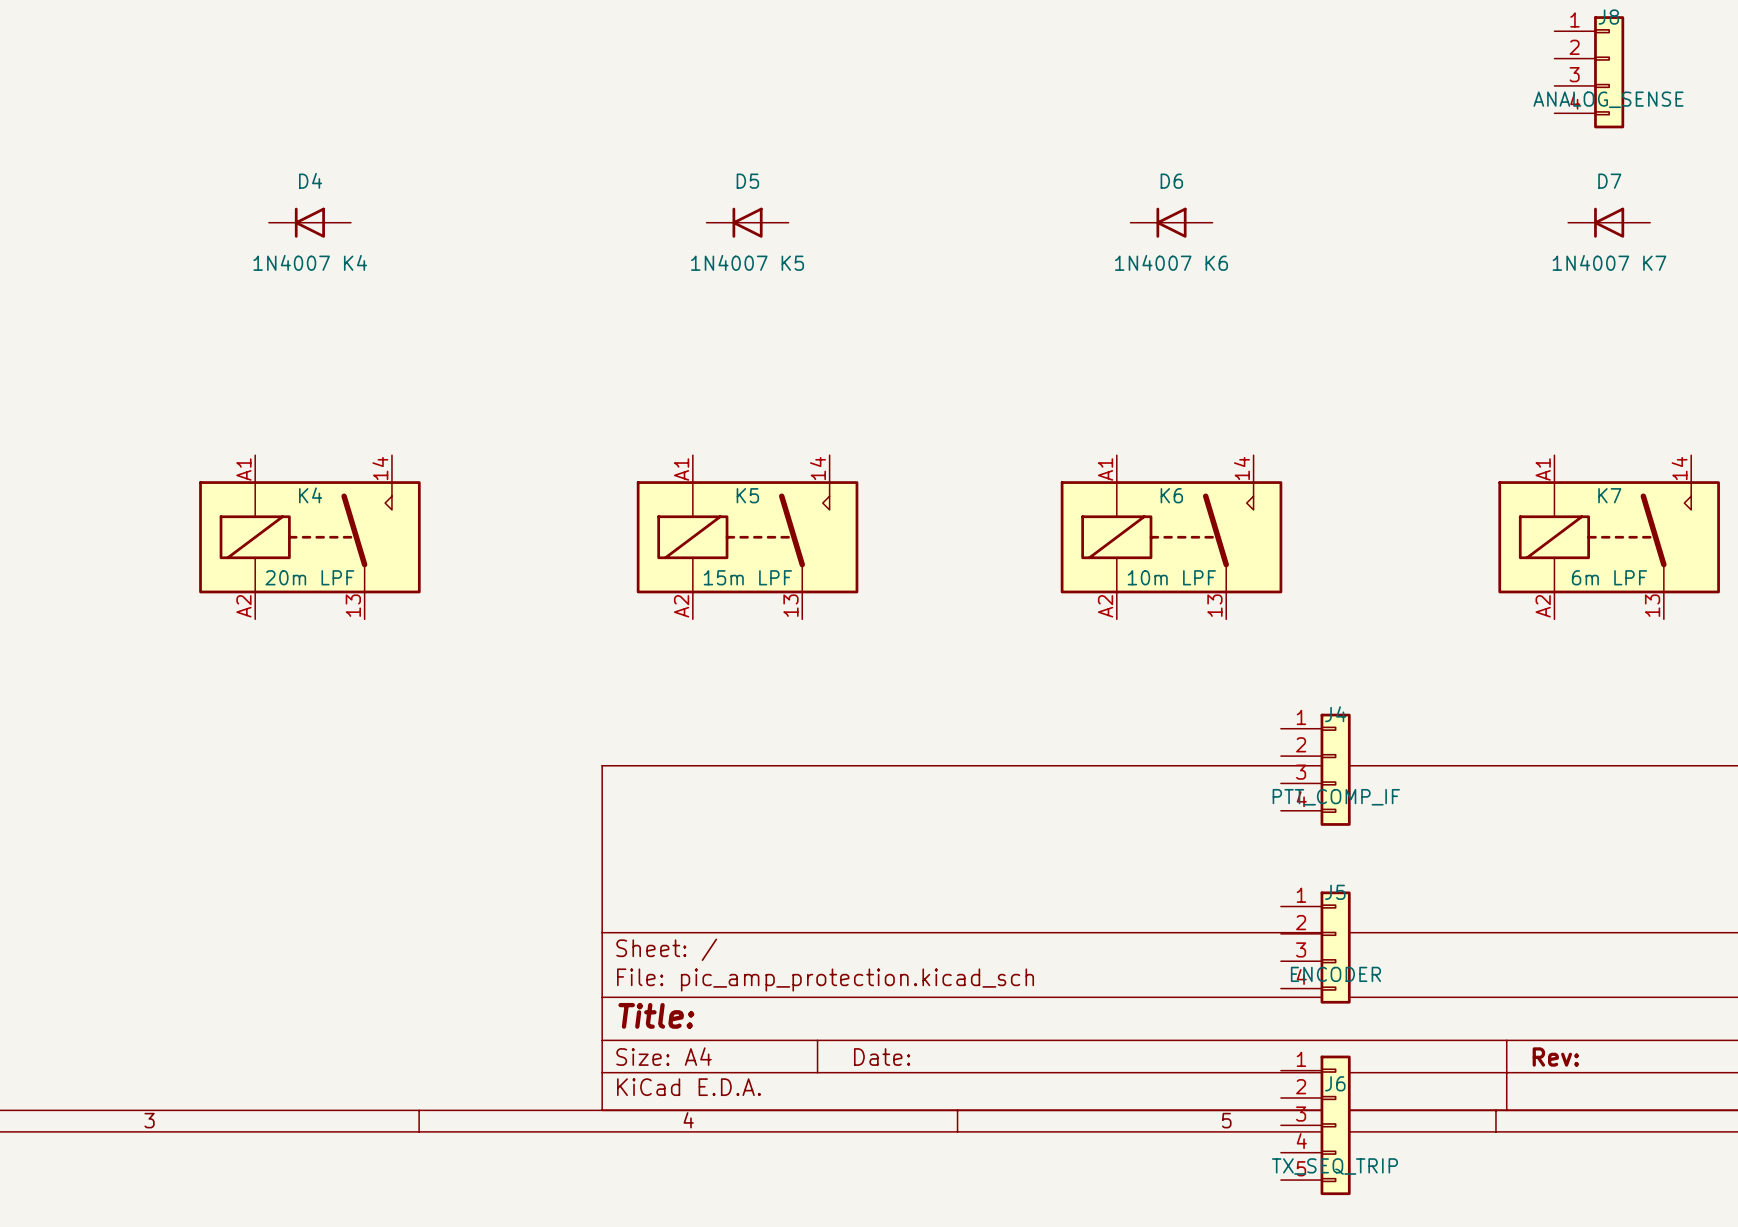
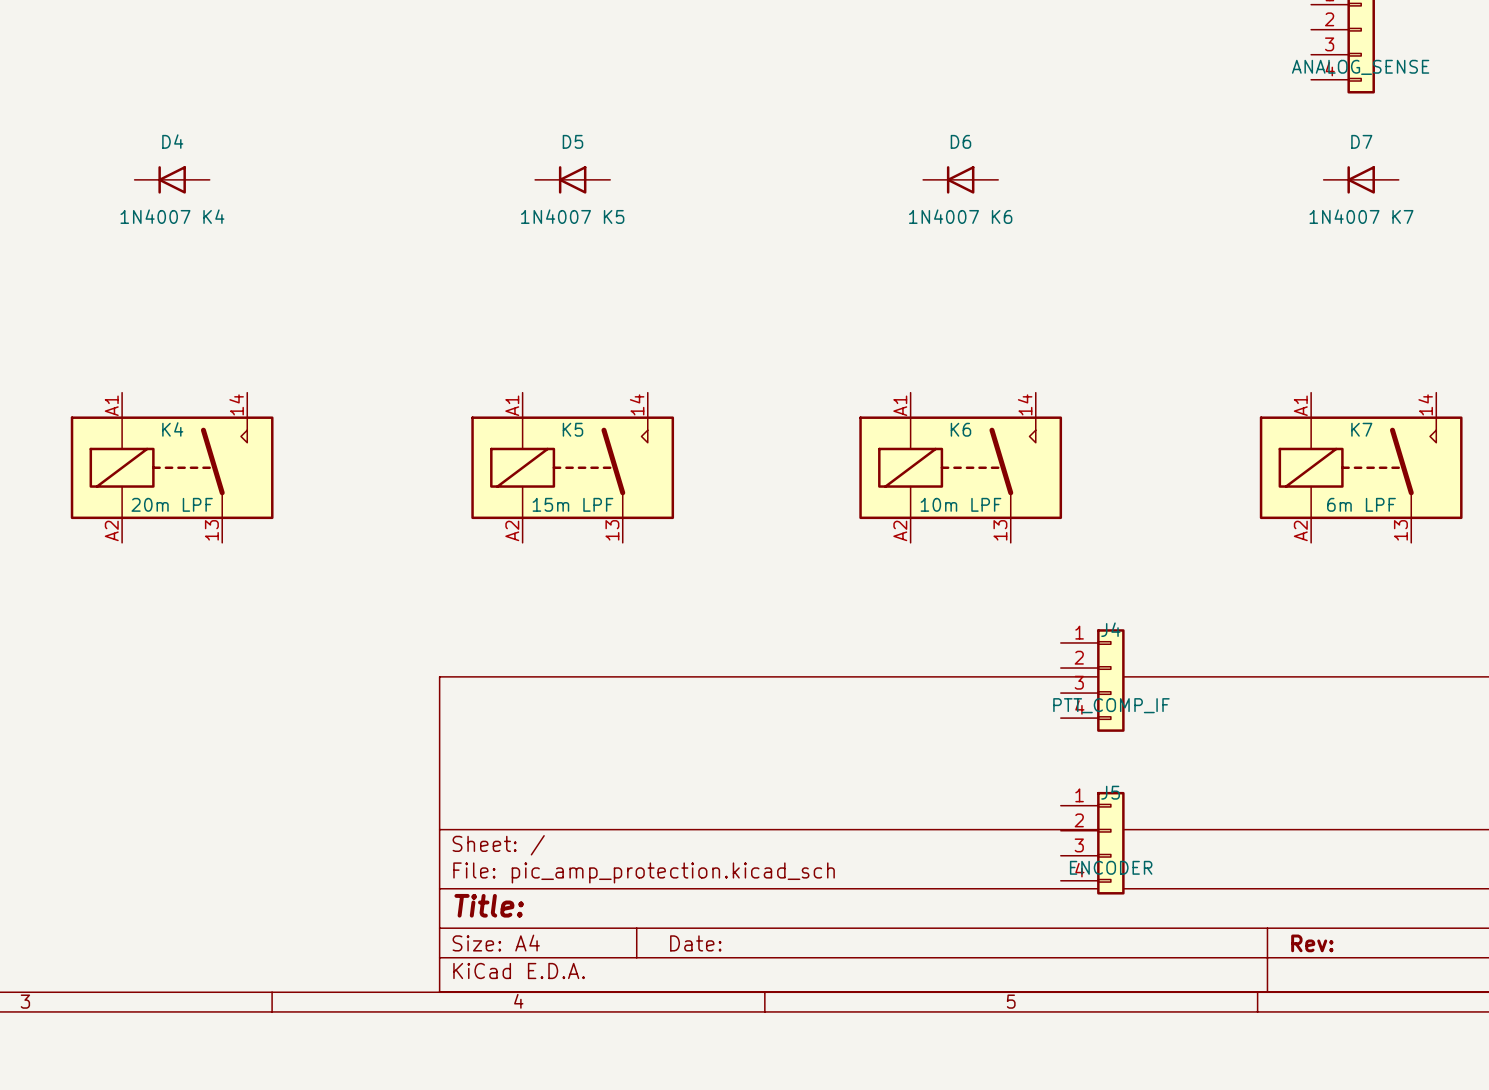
J6: TX_SEQ_TRIP (1315, 1125) -> none

